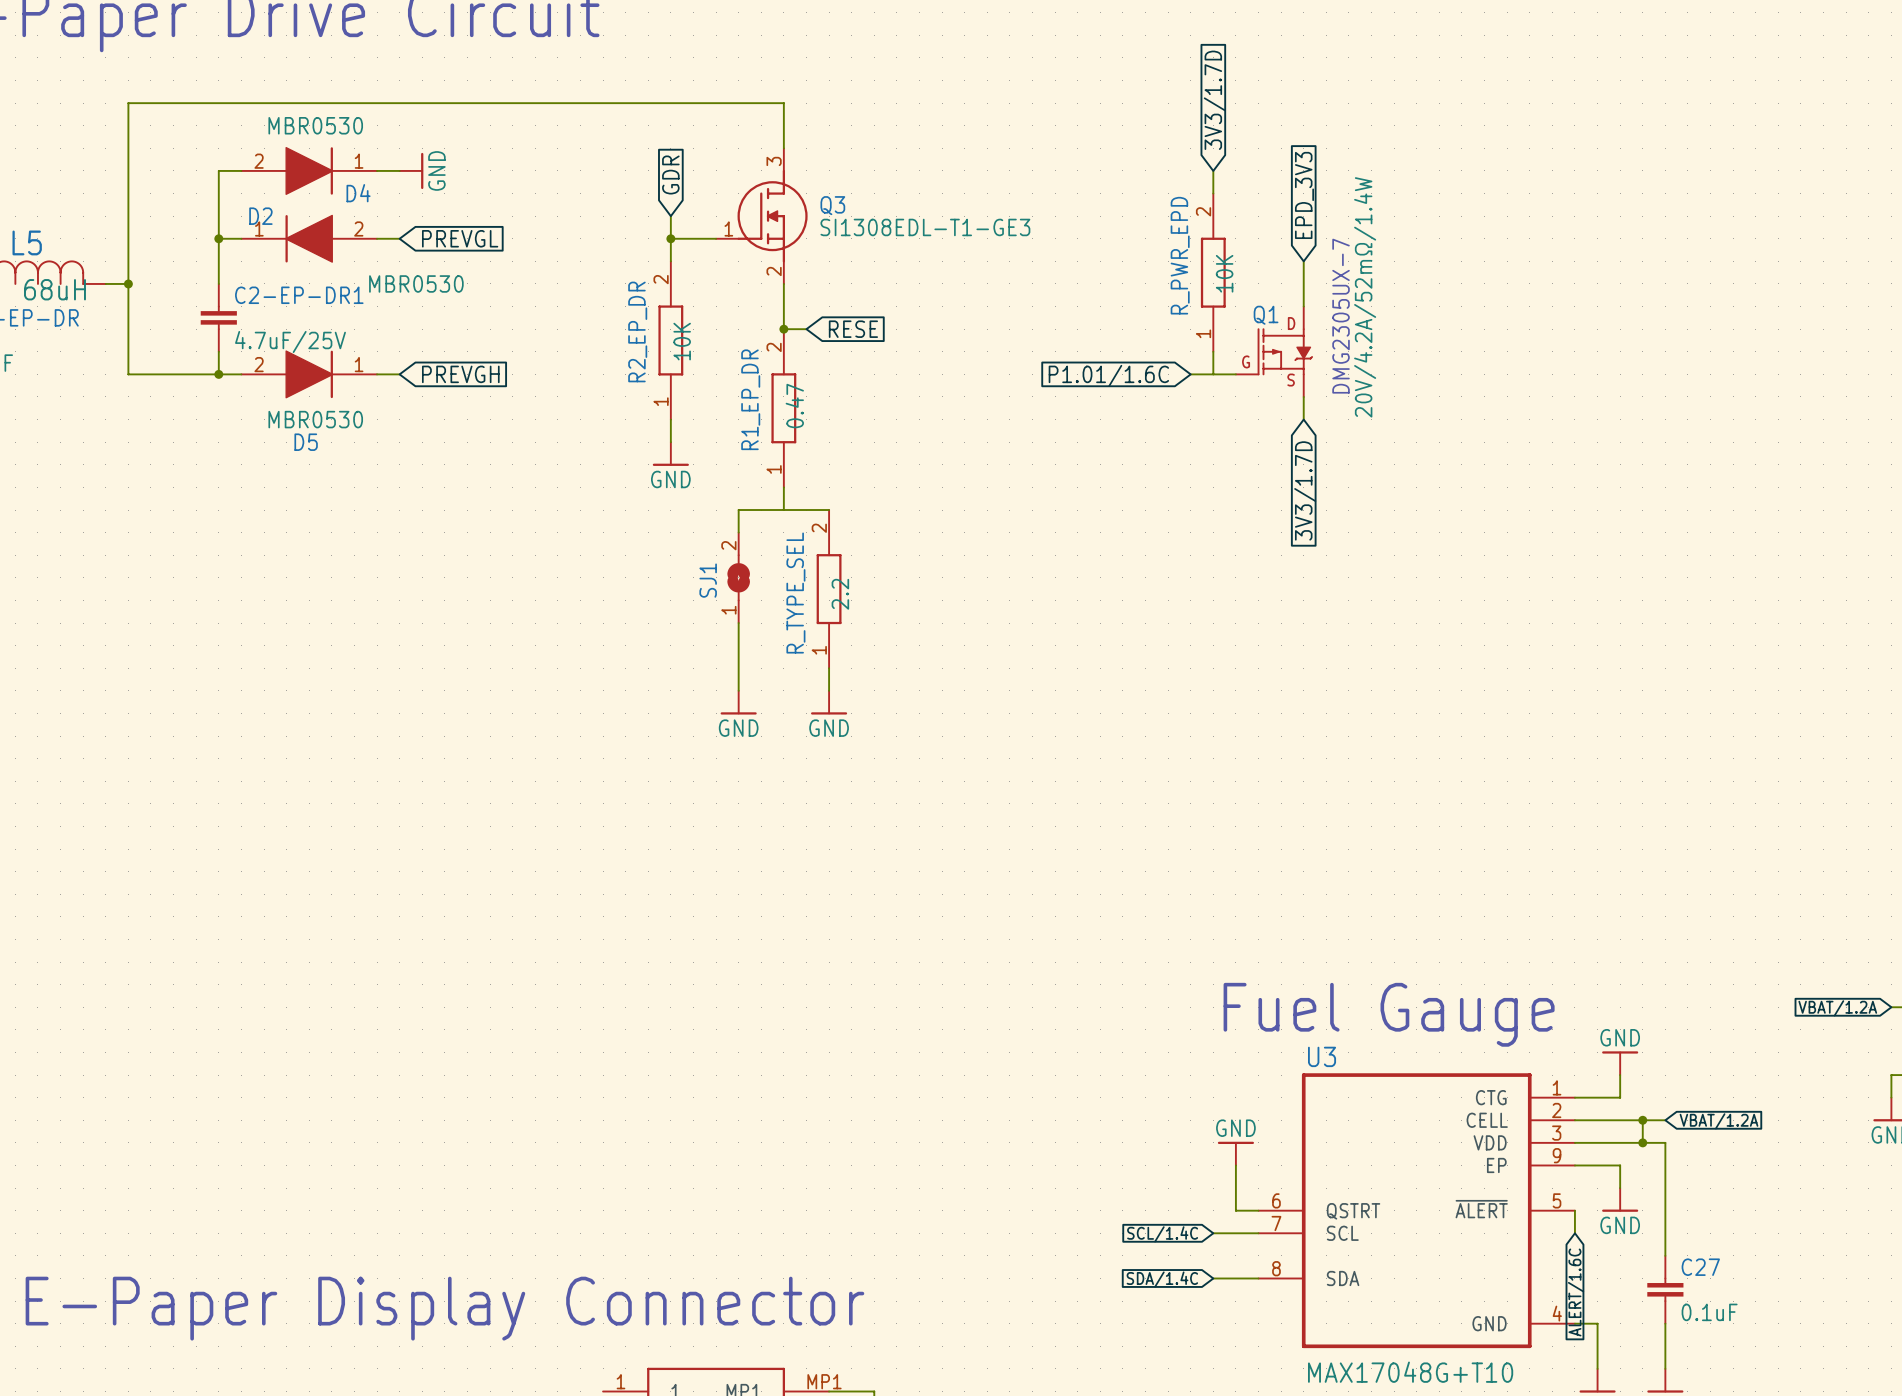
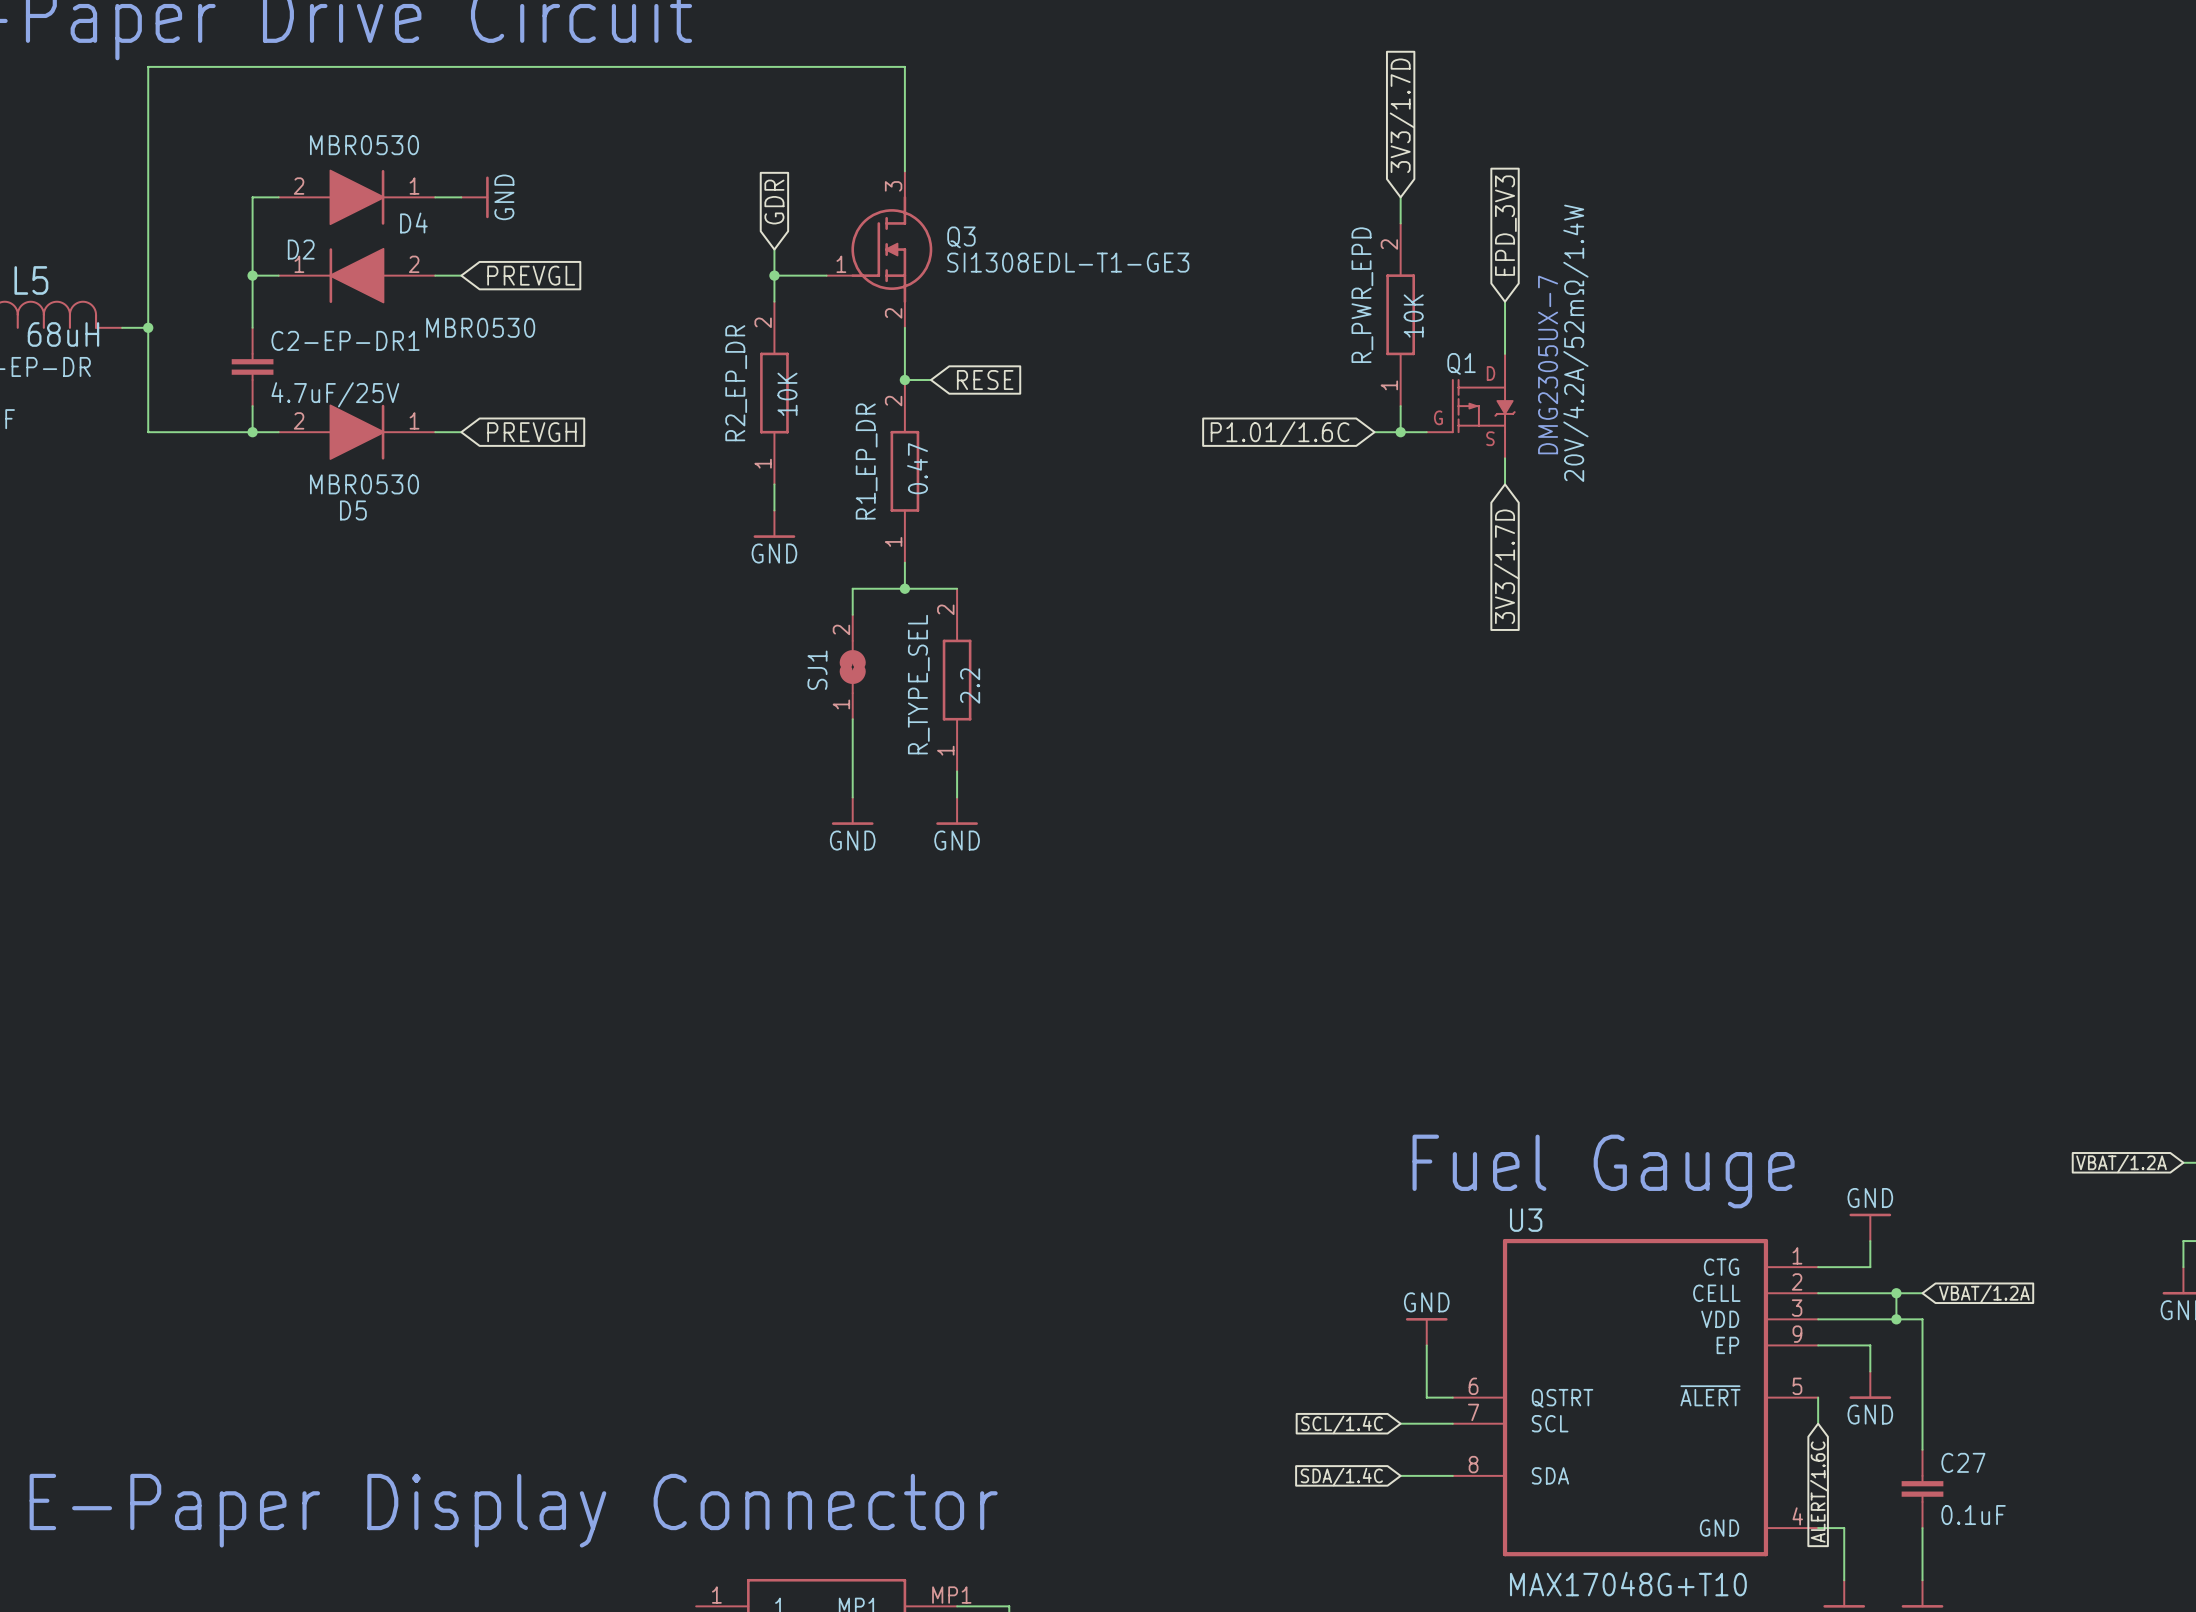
wire: (128, 103) (783, 103) -> (148, 119) (148, 66) (904, 66) (904, 119)
junction: none -> (1400, 432)
junction: none -> (904, 588)

